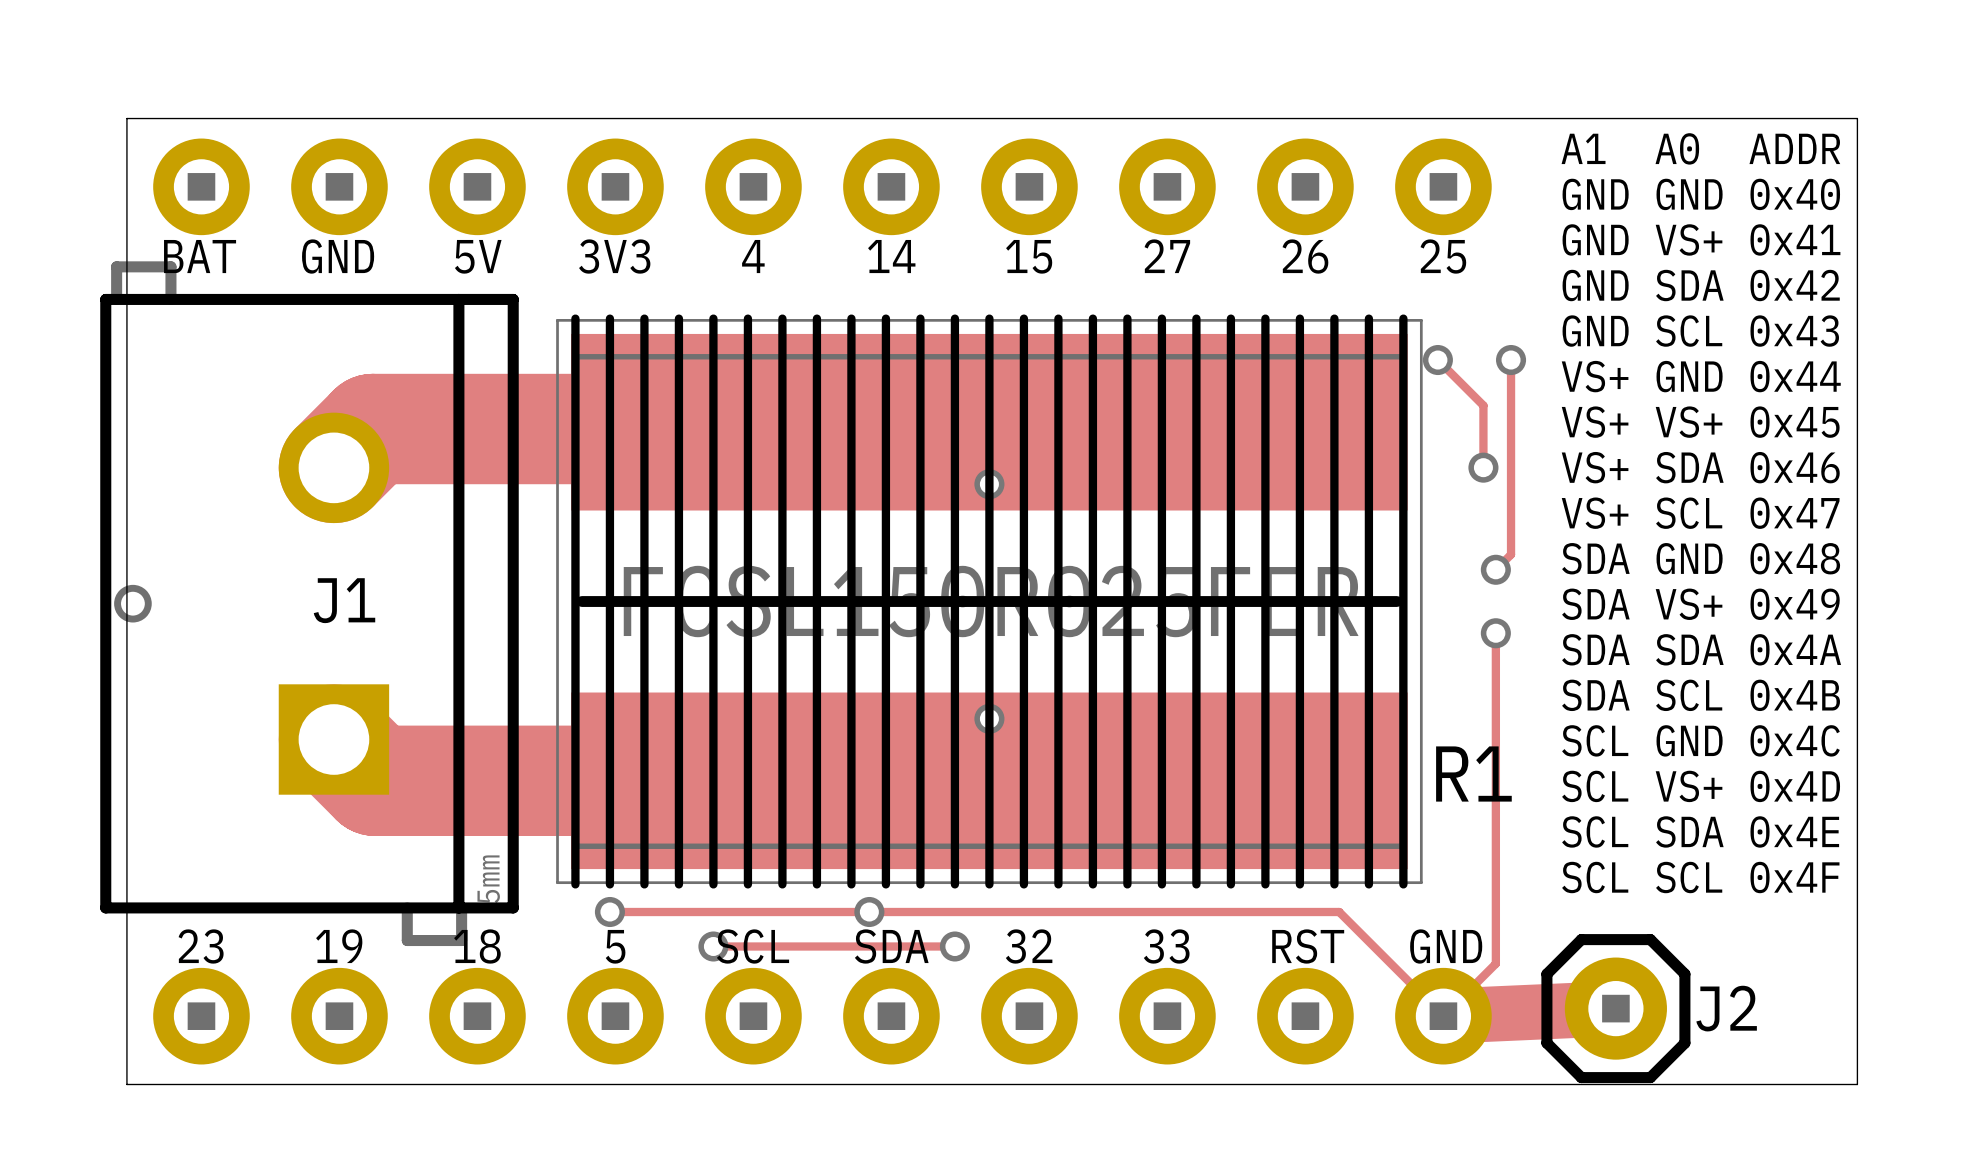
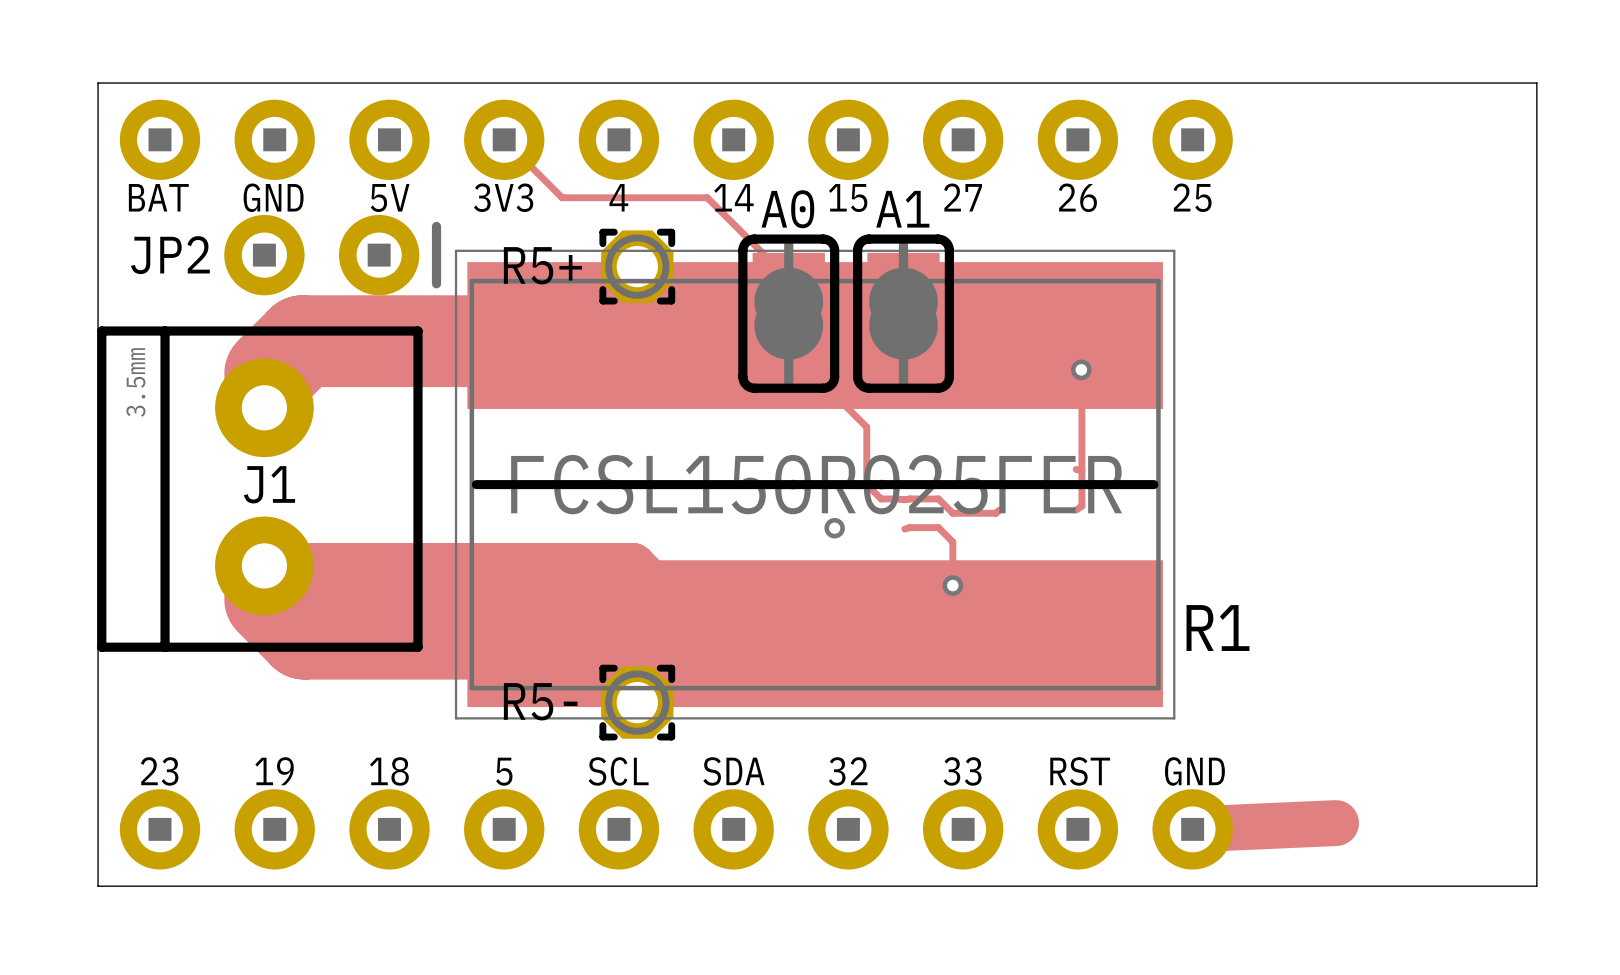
text: A1 A0 ADDR (1700, 148) -> none
track: none -> (504, 139) (562, 197) (707, 197) (788, 279) (779, 273) (777, 275)
text: GND GND 0x40 (1701, 194) -> none
text: GND VS+ 0x41 (1701, 239) -> none
J1 footprint: [100, 261, 519, 947] -> [97, 326, 423, 652]
text: GND SDA 0x42 (1701, 285) -> none
line: (575, 318) (575, 884) -> none
line: (609, 318) (609, 884) -> none
line: (644, 318) (644, 884) -> none
line: (678, 318) (678, 884) -> none
line: (713, 318) (713, 884) -> none
line: (747, 318) (747, 884) -> none
line: (782, 318) (782, 884) -> none
line: (816, 318) (816, 884) -> none
line: (851, 318) (851, 884) -> none
line: (885, 318) (885, 884) -> none
line: (920, 318) (920, 884) -> none
line: (954, 318) (954, 884) -> none
line: (989, 318) (989, 884) -> none
line: (1023, 318) (1023, 884) -> none
line: (1058, 318) (1058, 884) -> none
line: (1092, 318) (1092, 884) -> none
line: (1127, 318) (1127, 884) -> none
line: (1161, 318) (1161, 884) -> none
line: (1196, 318) (1196, 884) -> none
line: (1230, 318) (1230, 884) -> none
line: (1265, 318) (1265, 884) -> none
line: (1299, 318) (1299, 884) -> none
line: (1334, 318) (1334, 884) -> none
line: (1368, 318) (1368, 884) -> none
line: (1403, 318) (1403, 884) -> none
JP2: none -> (332, 255)
text: GND SCL 0x43 (1700, 331) -> none
R5+: none -> (637, 266)
track: (1437, 360) (1483, 405) (1483, 467) -> none
via: (1437, 360) -> none
track: (1511, 360) (1511, 554) (1495, 569) -> none
via: (1511, 360) -> none
text: VS+ GND 0x44 (1701, 376) -> none
A0: none -> (788, 313)
A1: none -> (903, 313)
text: VS+ VS+ 0x45 (1700, 422) -> none
track: none -> (788, 348) (866, 427) (866, 484) (881, 498) (938, 498) (952, 513) (995, 513) (999, 510)
track: none -> (1014, 363) (1024, 369) (1081, 369) (1081, 506) (1076, 510)
via: none -> (1081, 369)
via: (1483, 467) -> none
text: VS+ SDA 0x46 (1700, 467) -> none
via: (989, 484) -> none
text: VS+ SCL 0x47 (1700, 513) -> none
text: SDA GND 0x48 (1701, 558) -> none
via: (1495, 569) -> none
track: none -> (1076, 469) (1081, 470)
text: SDA VS+ 0x49 (1700, 604) -> none
track: (1495, 633) (1495, 963) (1443, 1016) (1339, 912) (609, 912) -> none
via: (1495, 633) -> none
text: SDA SDA 0x4A (1701, 649) -> none
via: none -> (834, 528)
track: none -> (904, 529) (938, 527) (952, 541) (952, 585)
text: SDA SCL 0x4B (1701, 695) -> none
track: none -> (264, 565) (632, 565) (665, 599)
via: (989, 718) -> none
via: none -> (952, 585)
text: SCL GND 0x4C (1700, 740) -> none
text: SCL VS+ 0x4D (1701, 786) -> none
text: SCL SDA 0x4E (1700, 831) -> none
R5-: none -> (637, 702)
text: SCL SCL 0x4F (1700, 877) -> none
J1 value: 5mm (488, 879) -> 3.5mm (135, 382)
via: (609, 912) -> none
via: (869, 912) -> none
track: (713, 946) (954, 946) -> none
via: (713, 946) -> none
via: (954, 946) -> none
J2: (1615, 1008) -> none

